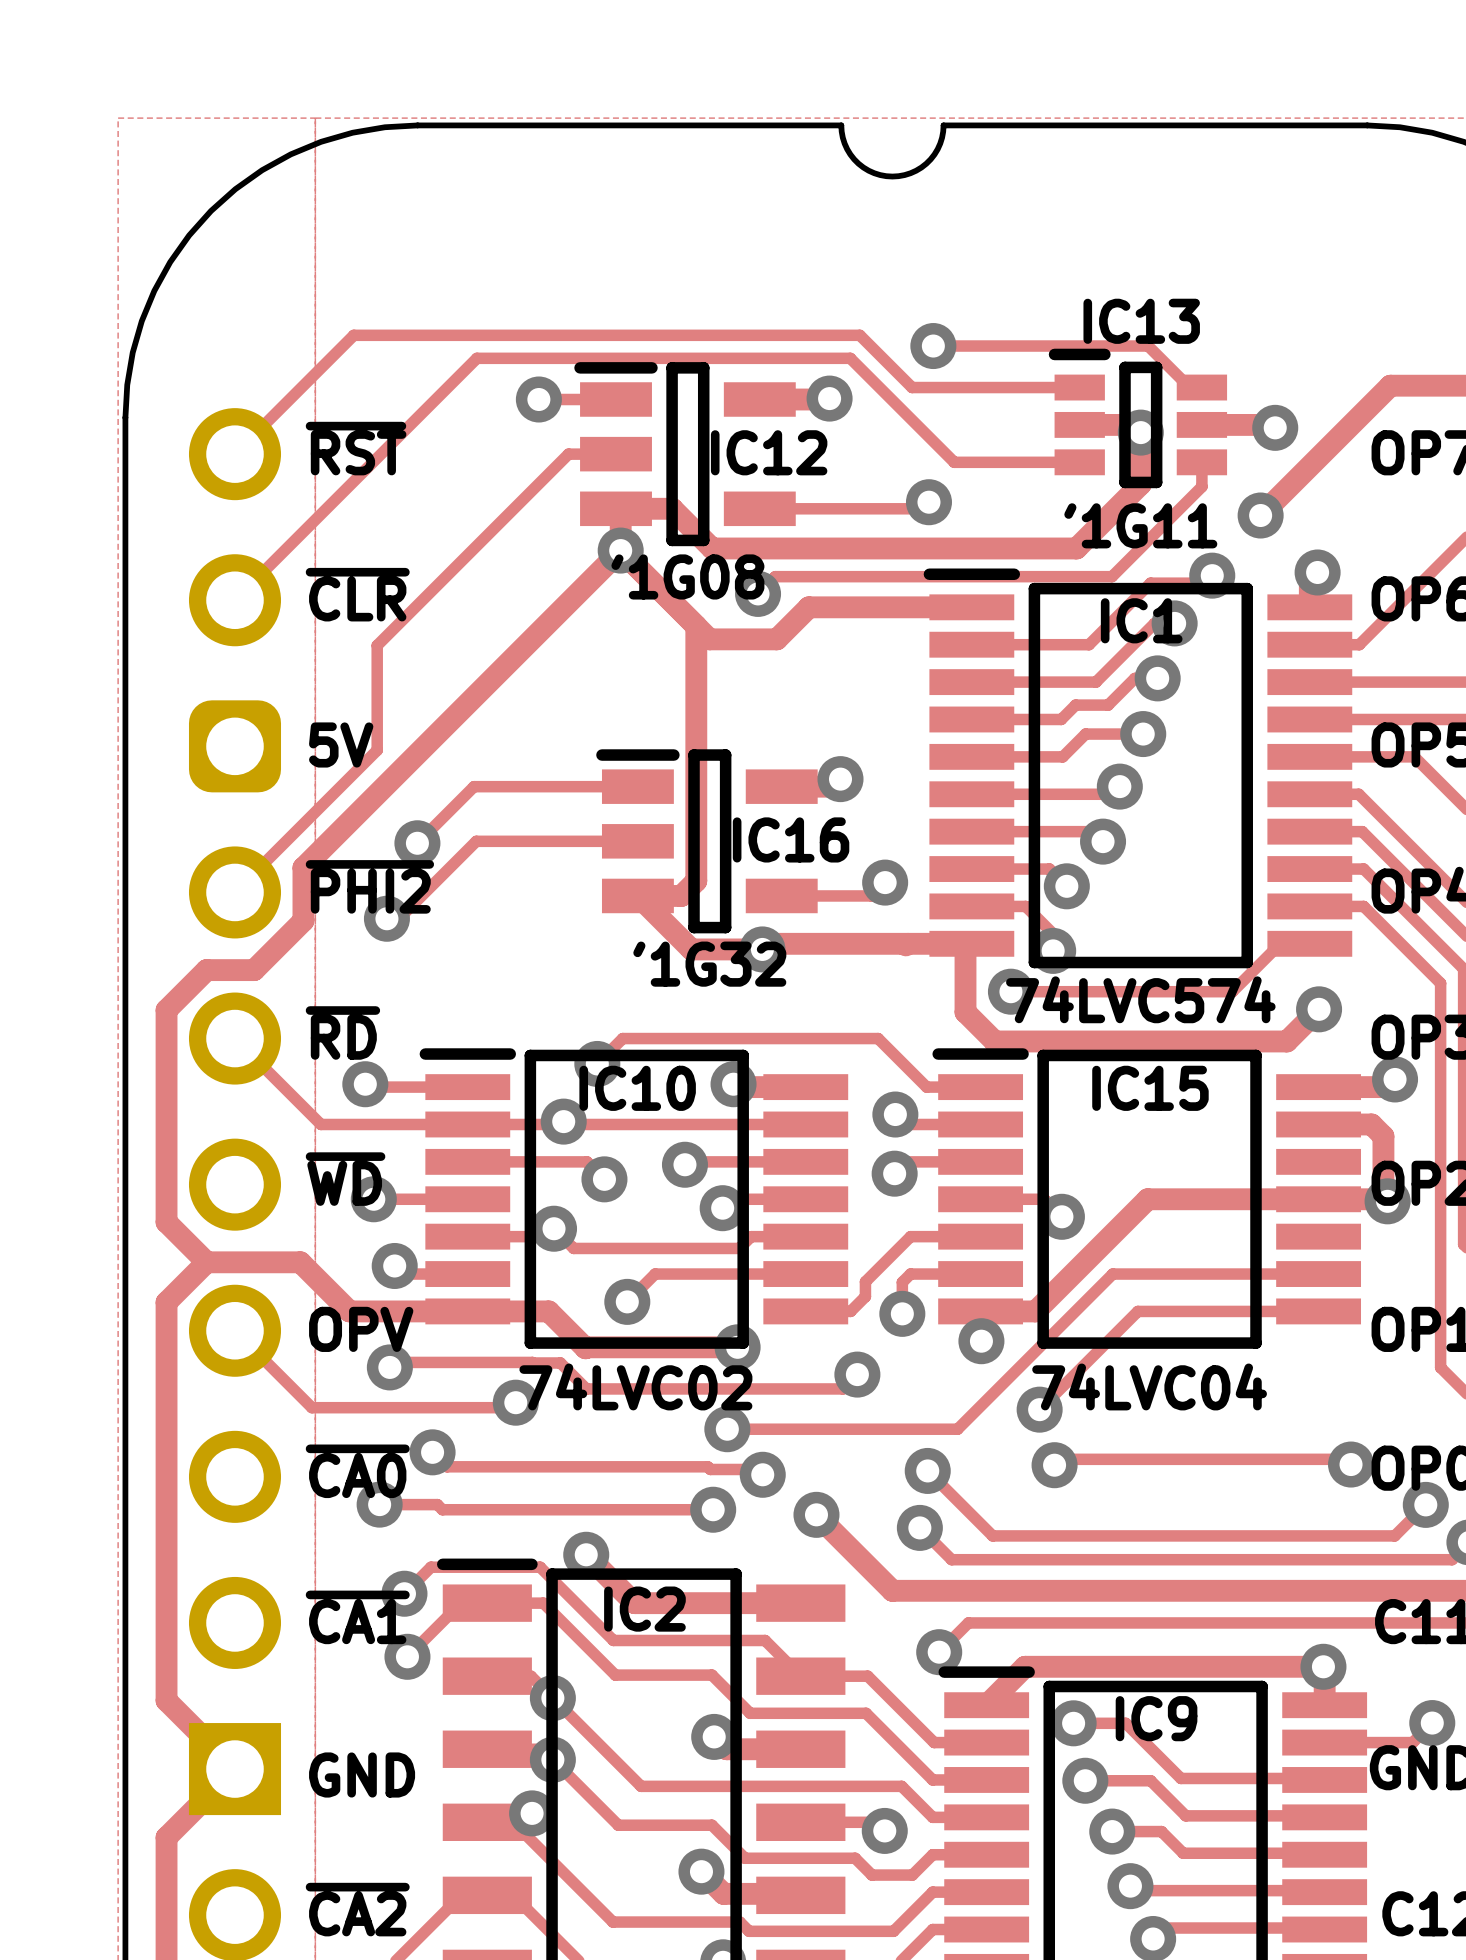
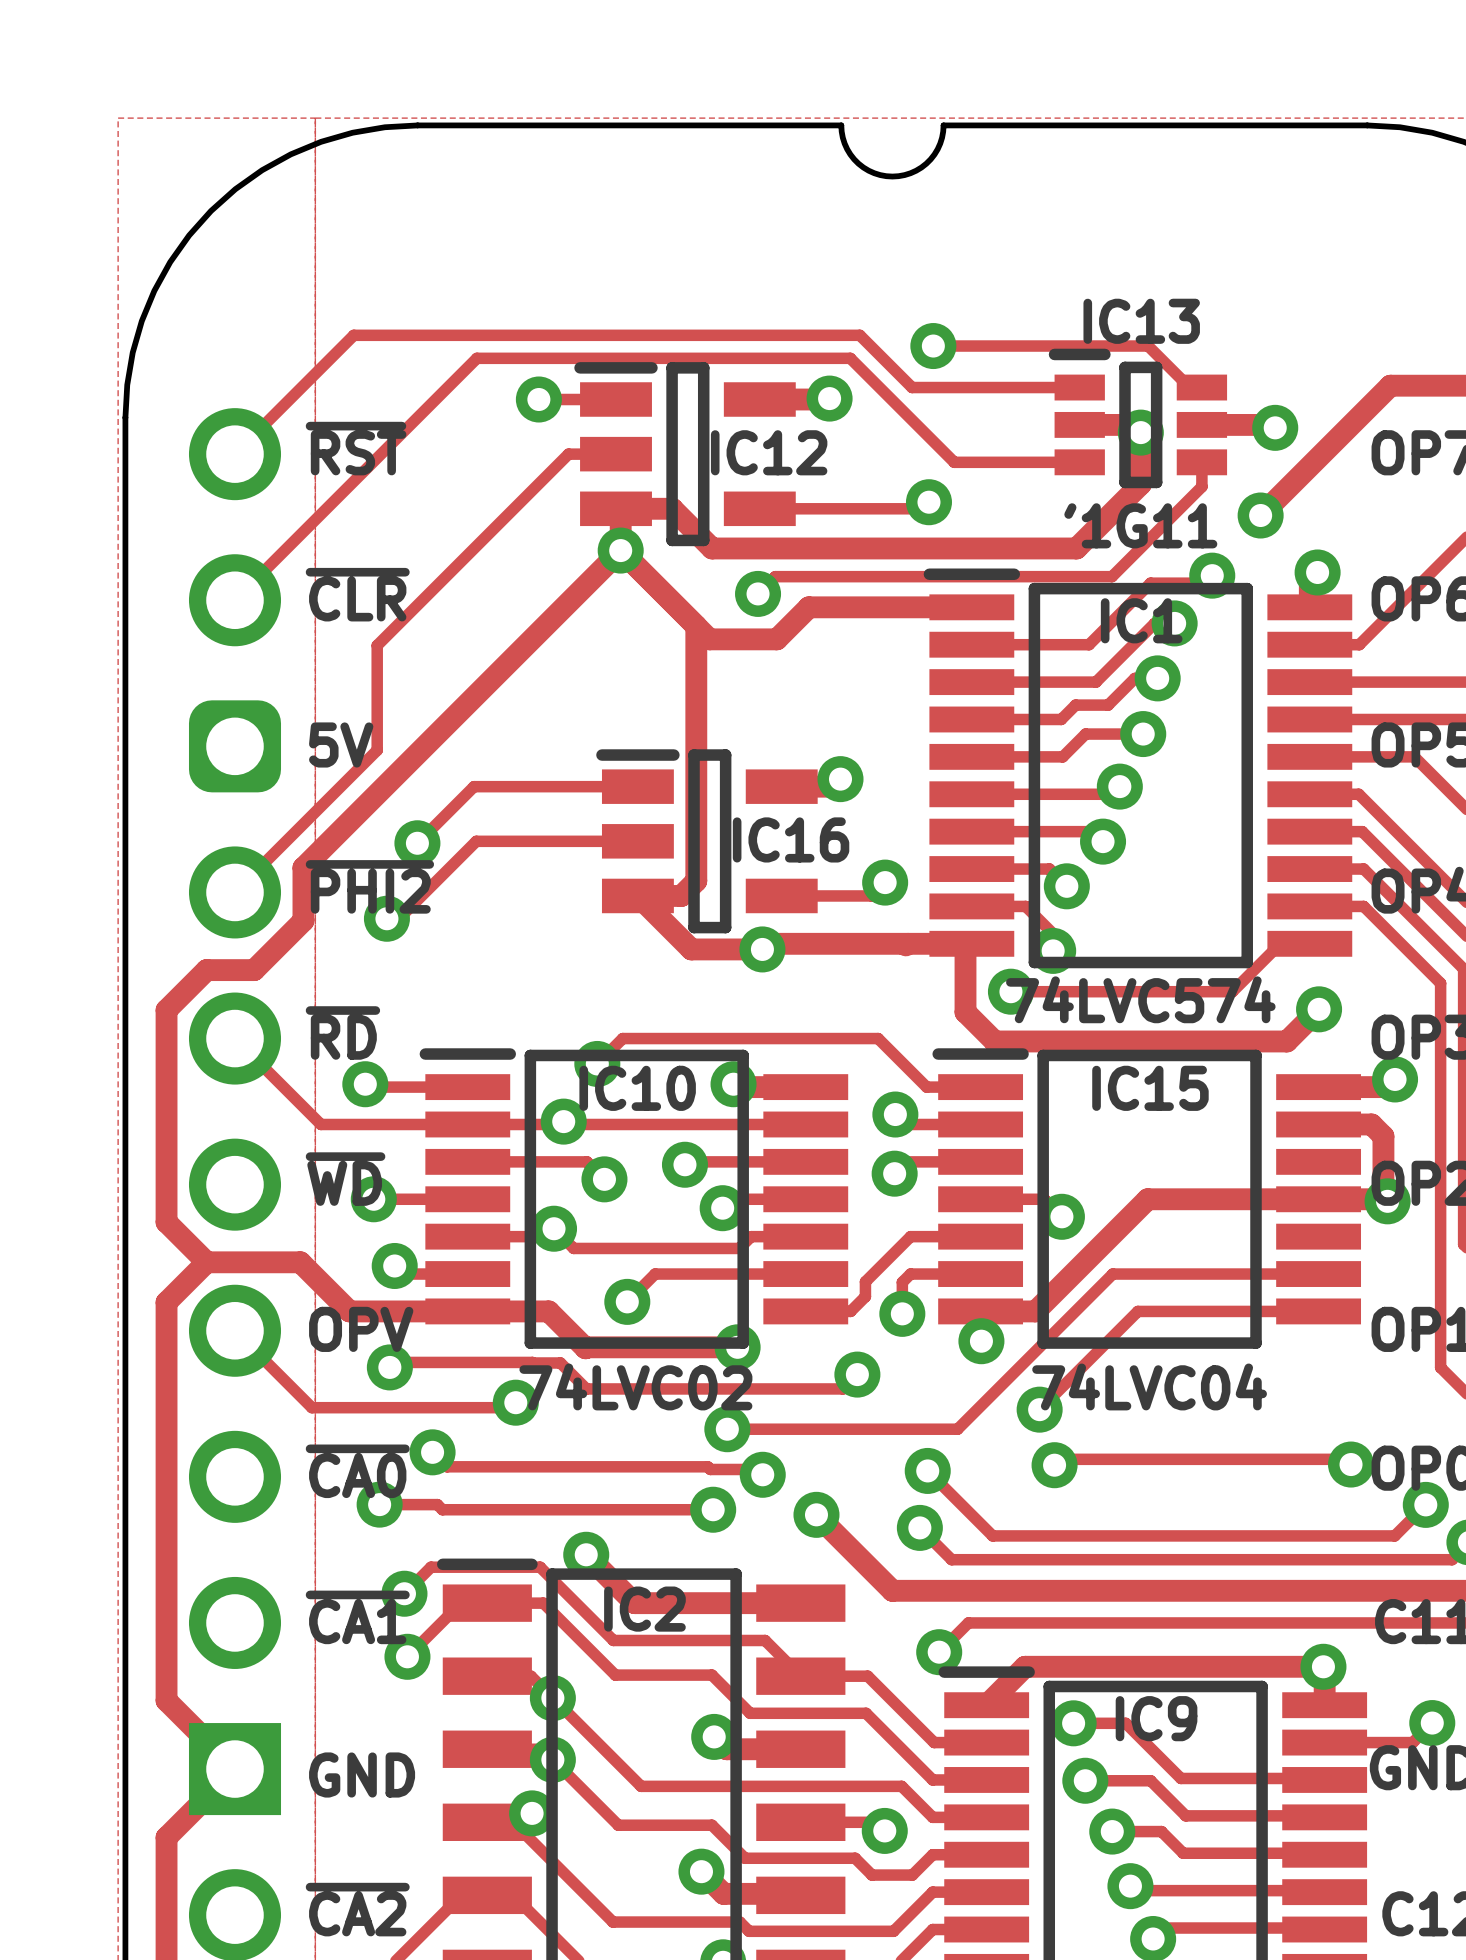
IC12 text: '1G08 (687, 576) -> none
IC16 text: '1G32 (709, 964) -> none

